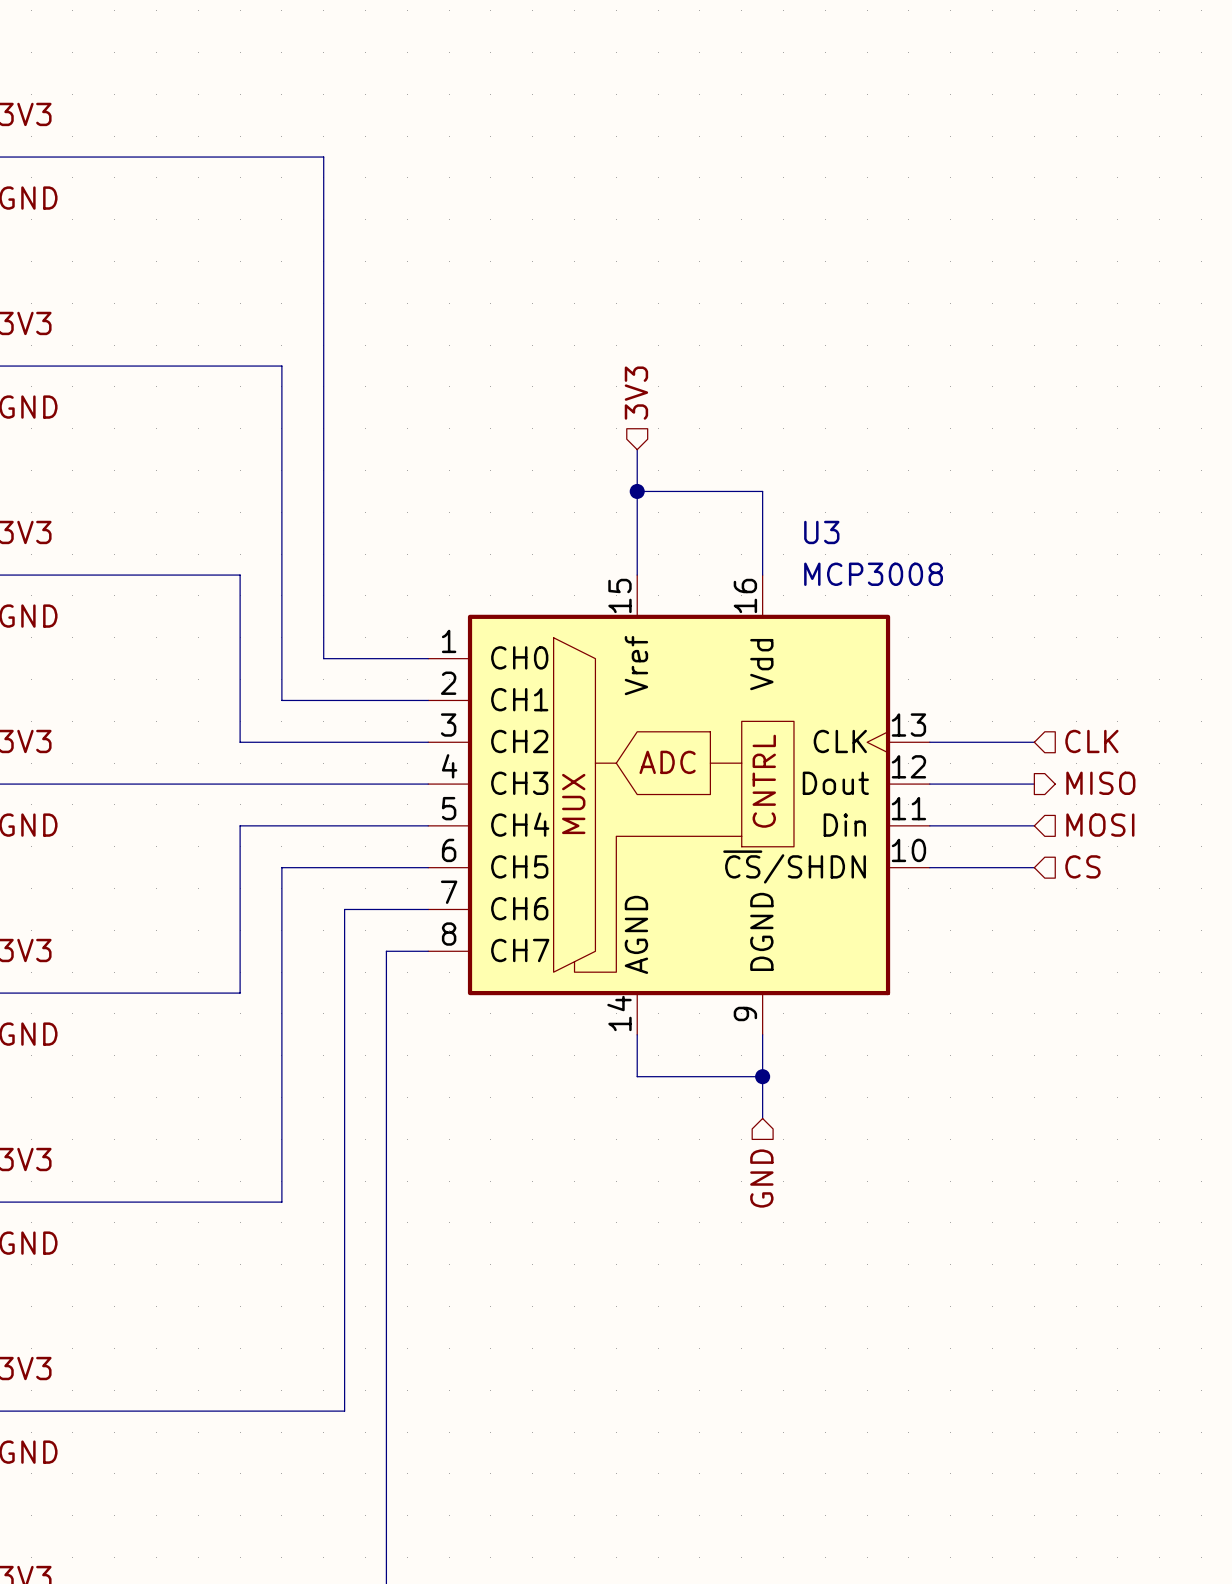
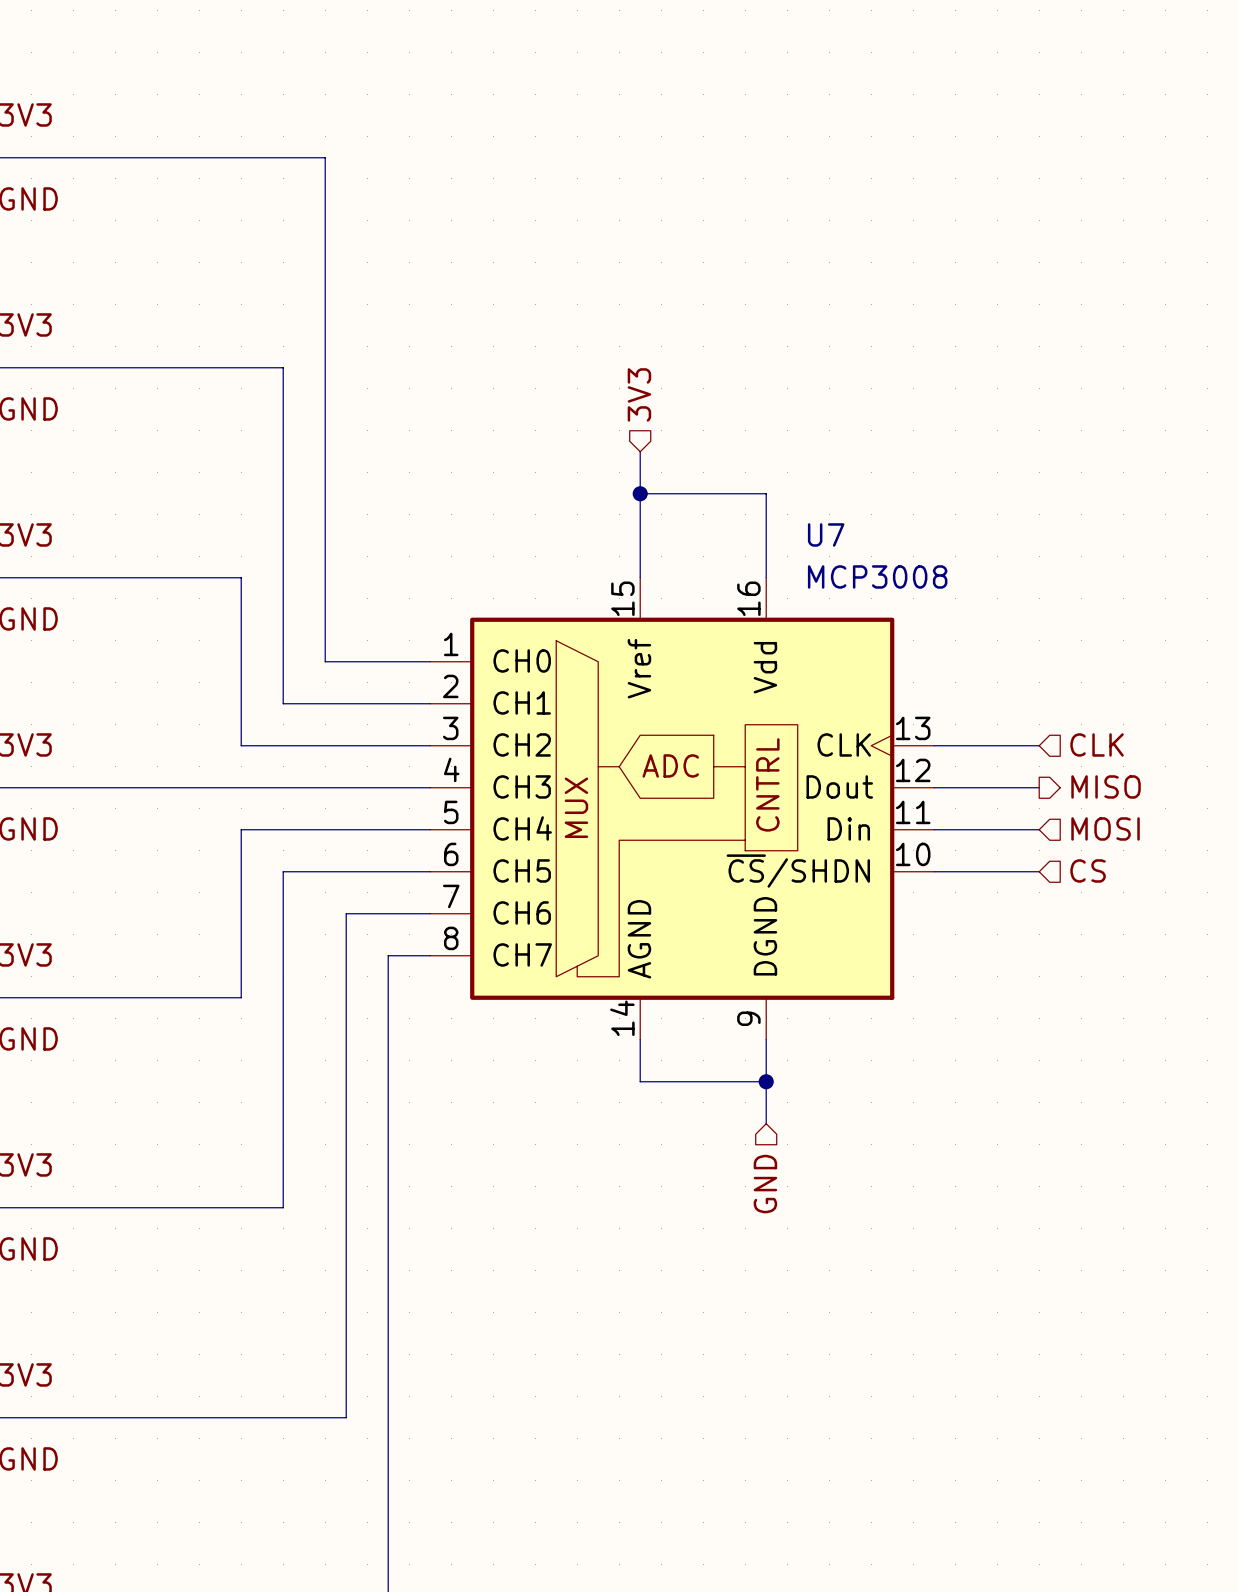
U3 name: U3 (821, 532) -> U7 (826, 534)

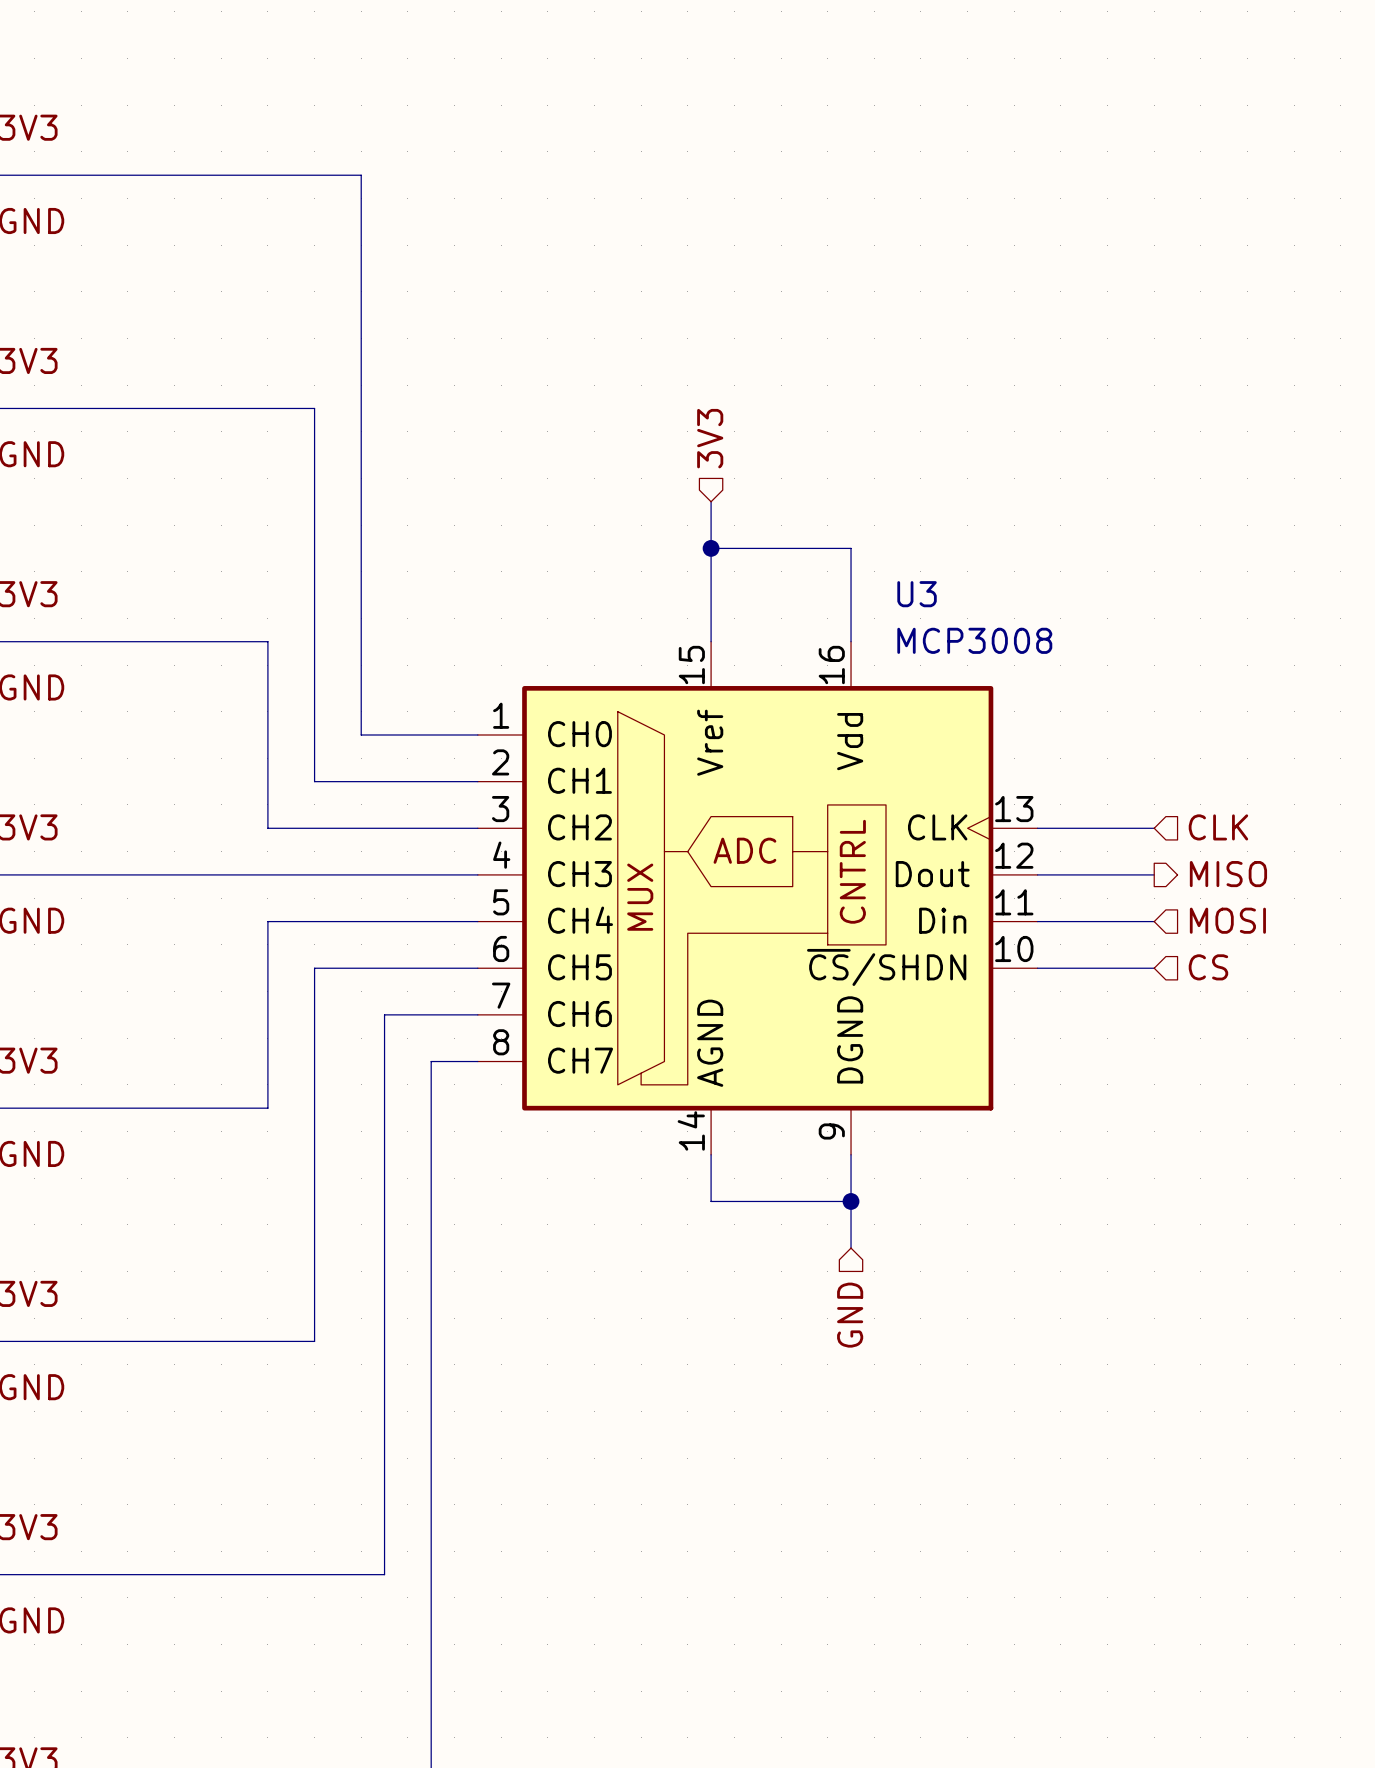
U7 name: U7 (826, 534) -> U3 (917, 594)

